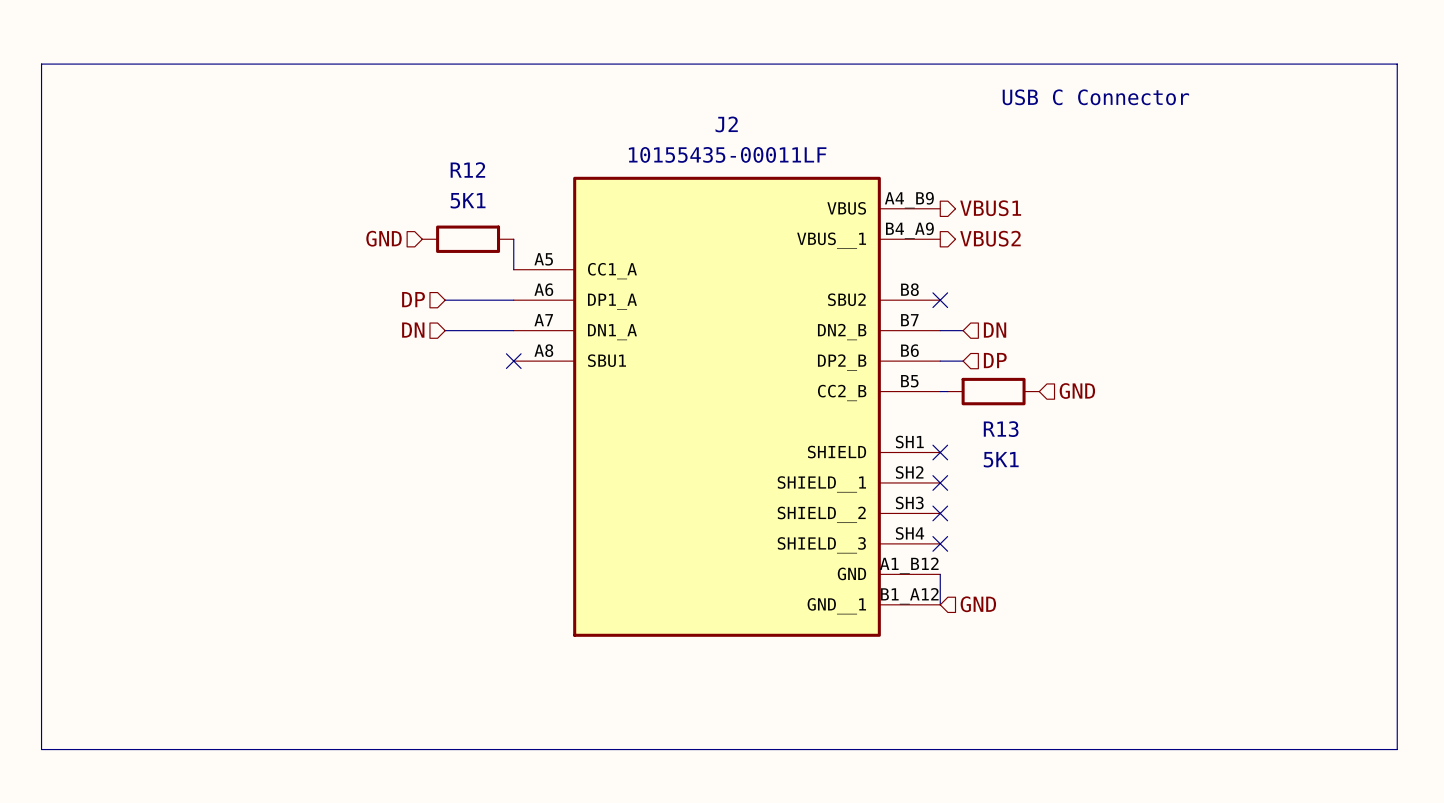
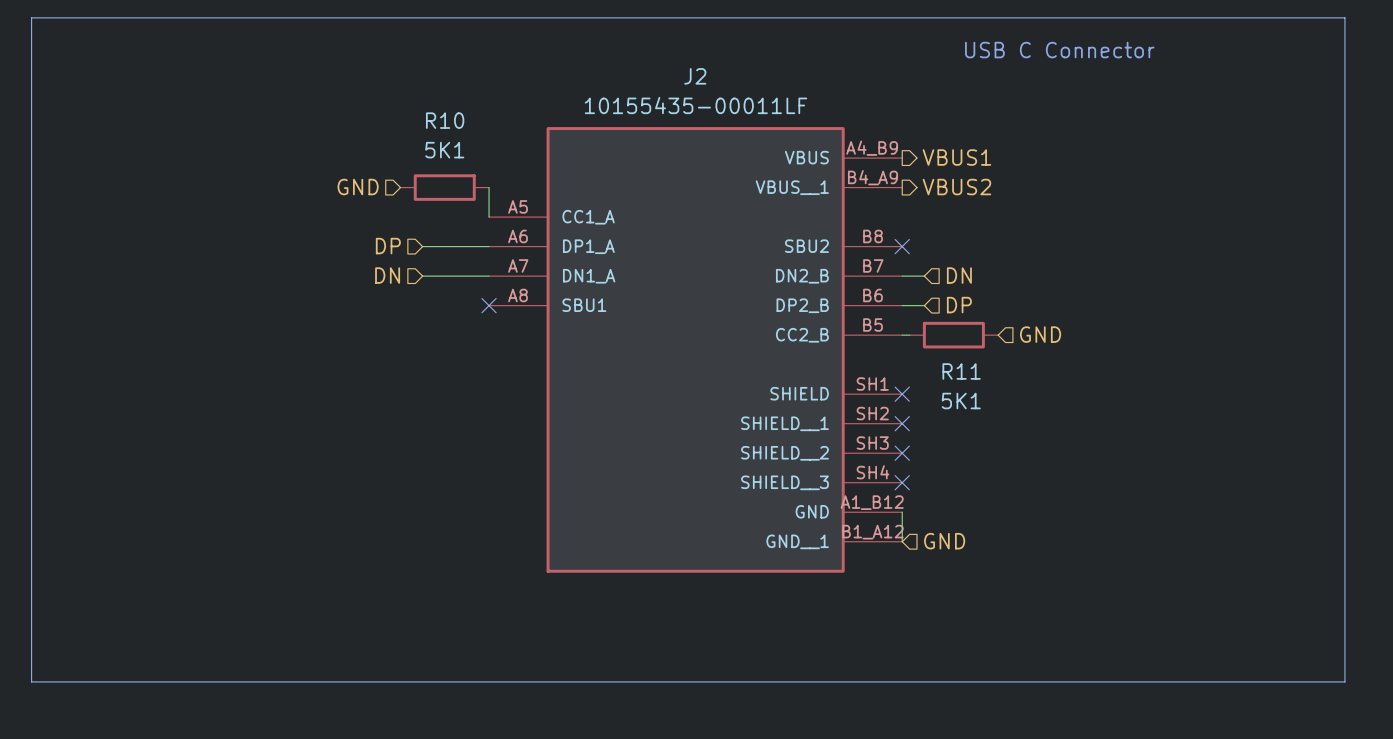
R12 name: R12 (467, 169) -> R10 (445, 120)
R13 name: R13 (1001, 429) -> R11 (961, 371)

